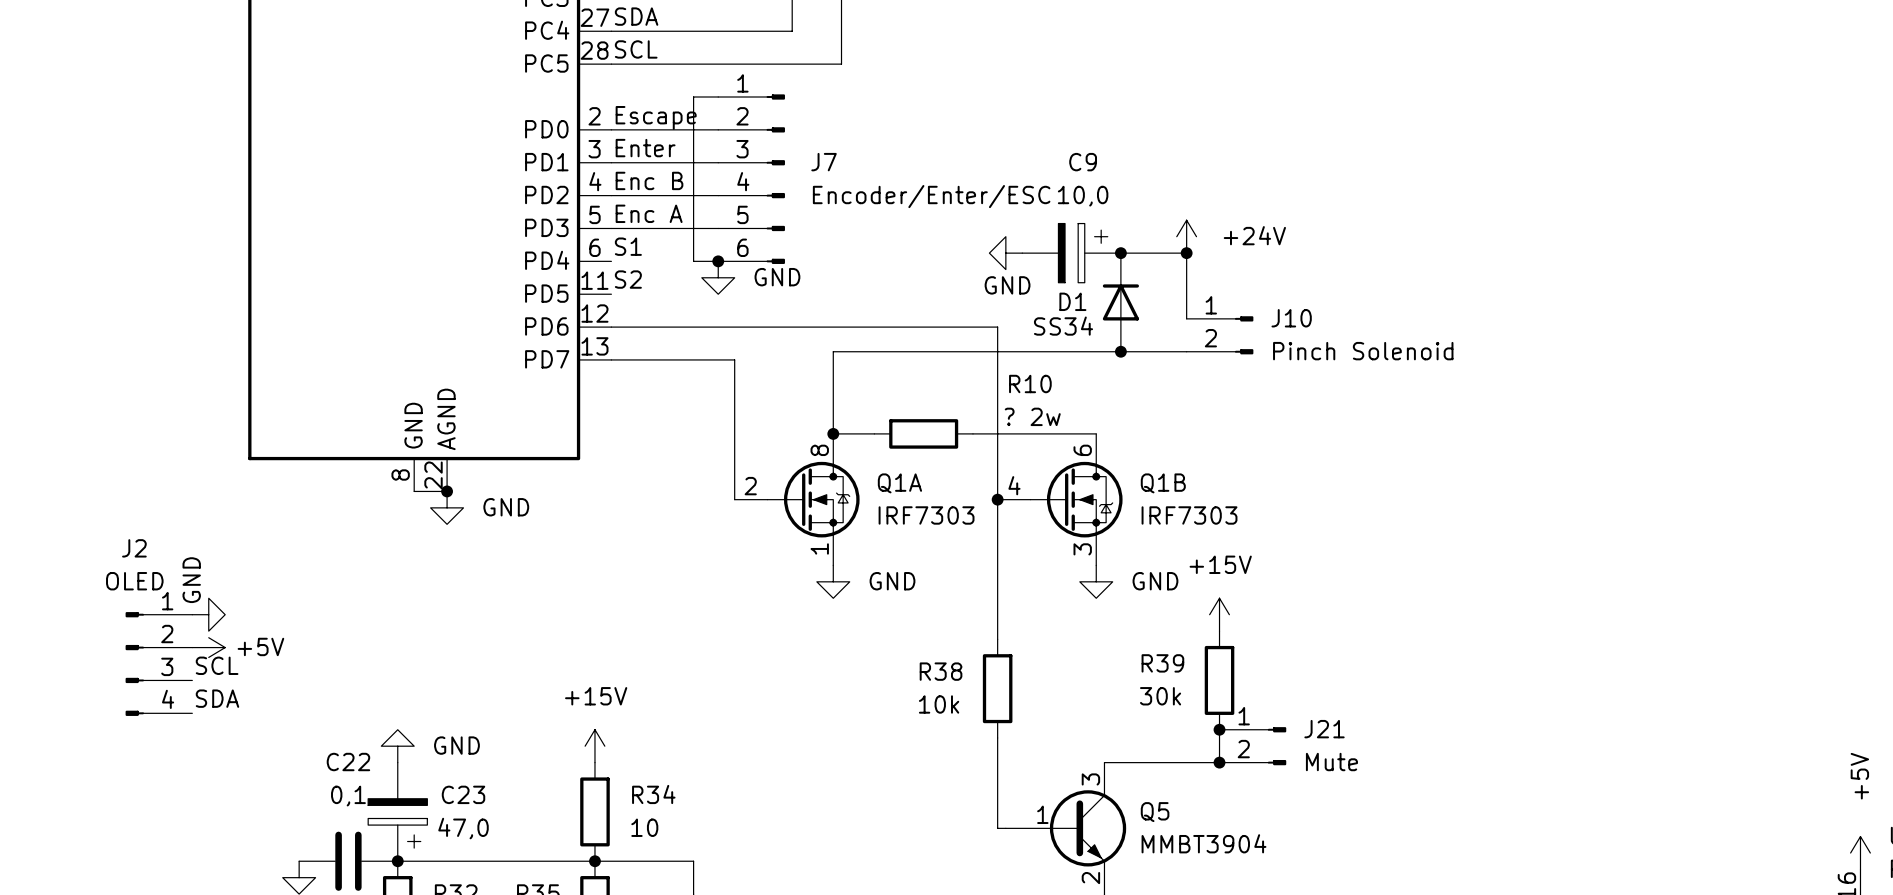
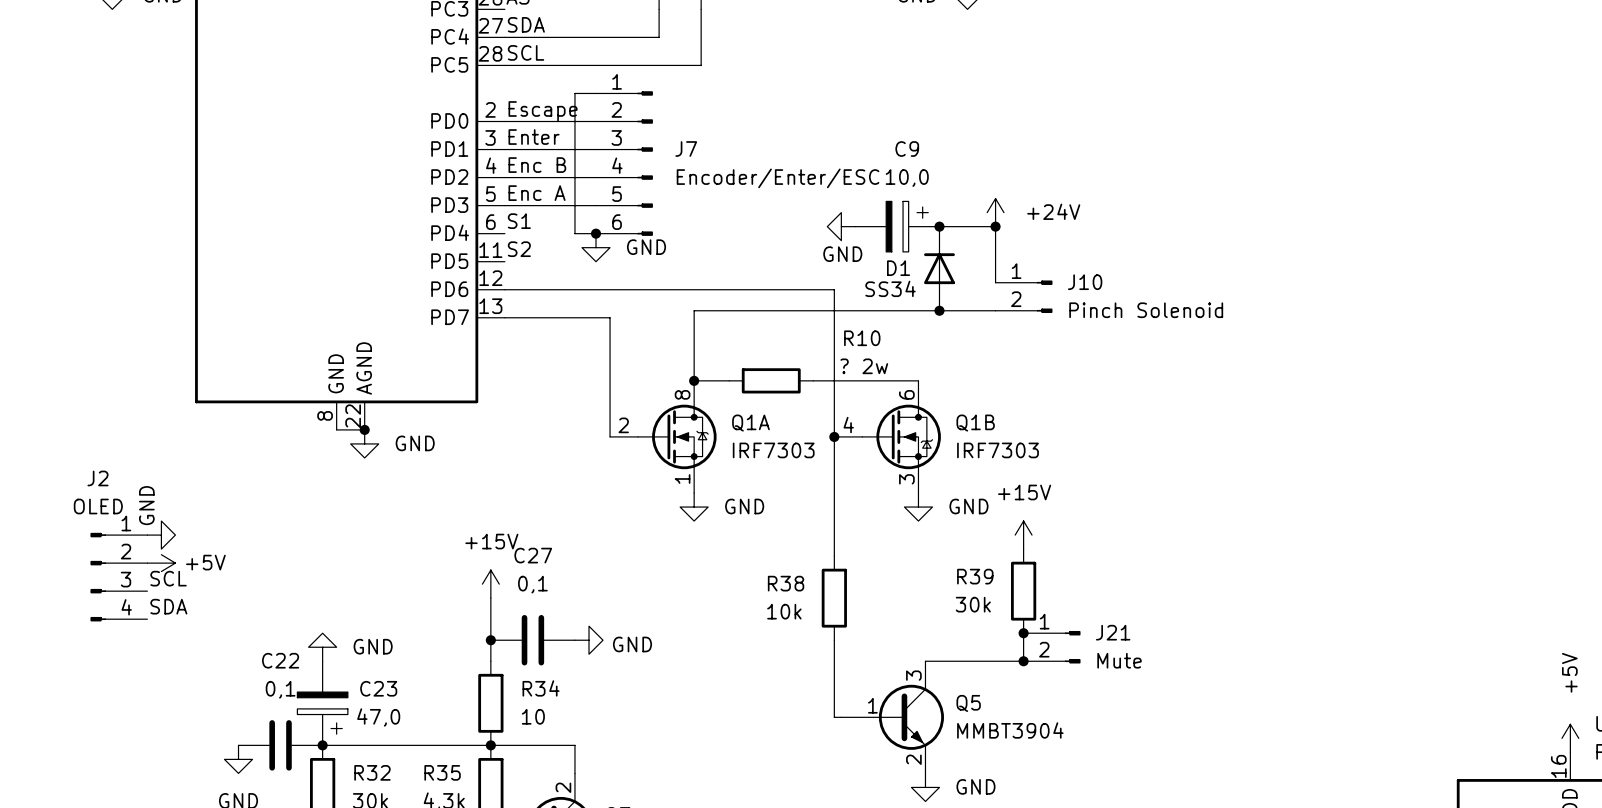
wire: none -> (490, 598) (490, 661)
junction: none -> (490, 640)
C27: none -> 0,1 (532, 640)
power symbol: none -> GND (589, 640)
power symbol position: +15V (594, 746) -> +15V (490, 584)

